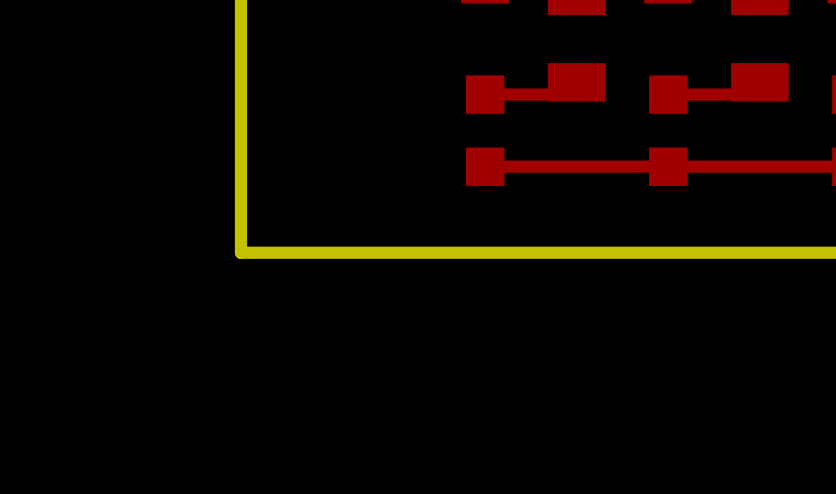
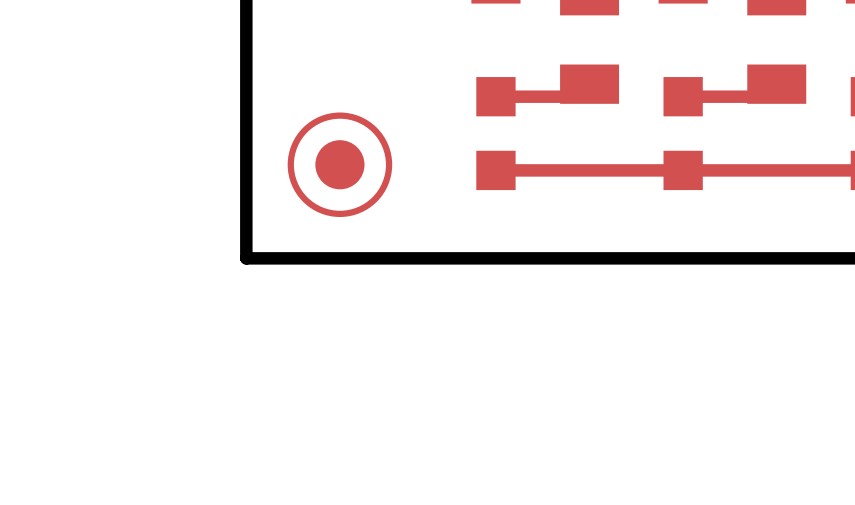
part: none -> (339, 164)

